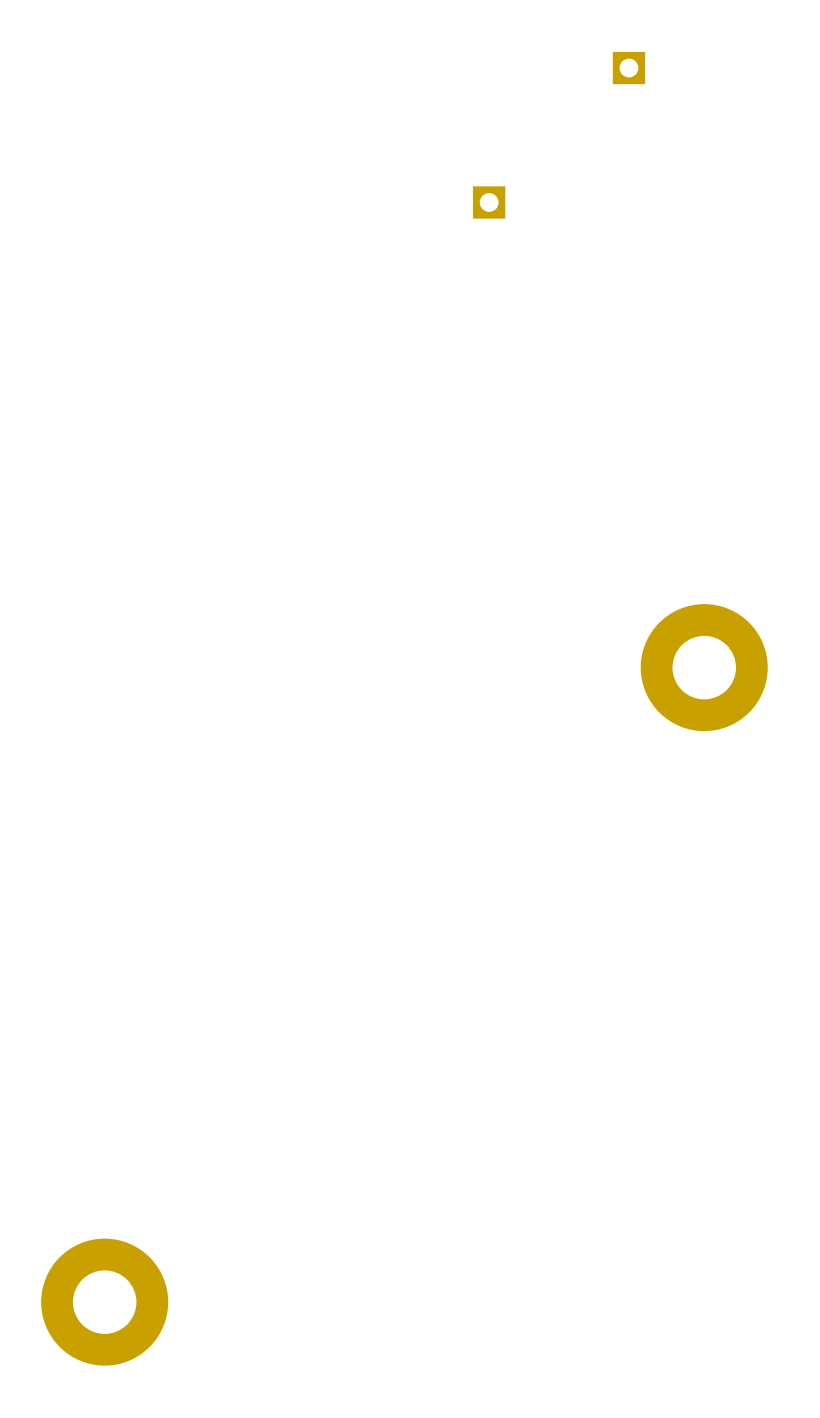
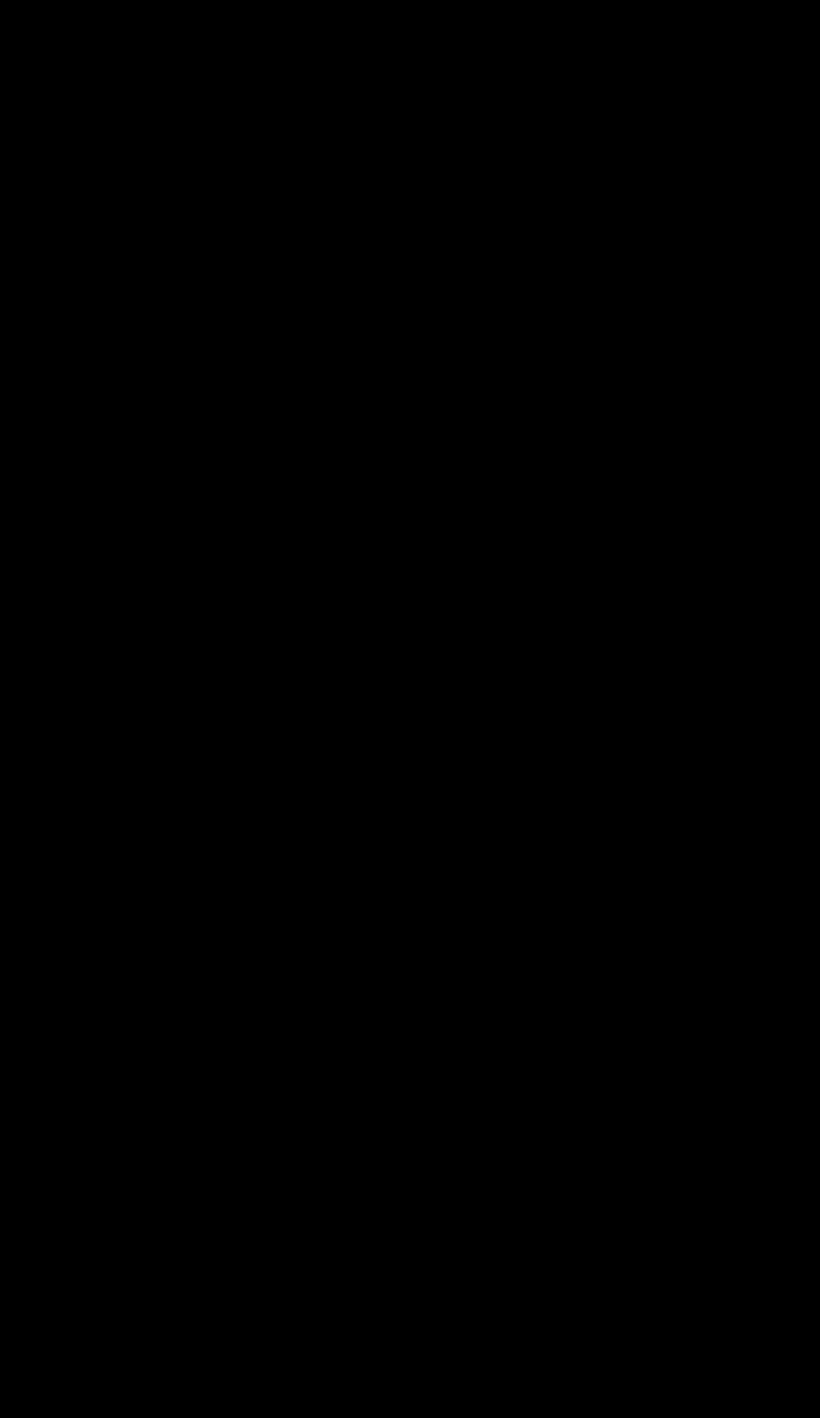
part: (628, 68) -> none
part: (489, 202) -> none
part: (704, 667) -> none
part: (104, 1302) -> none

